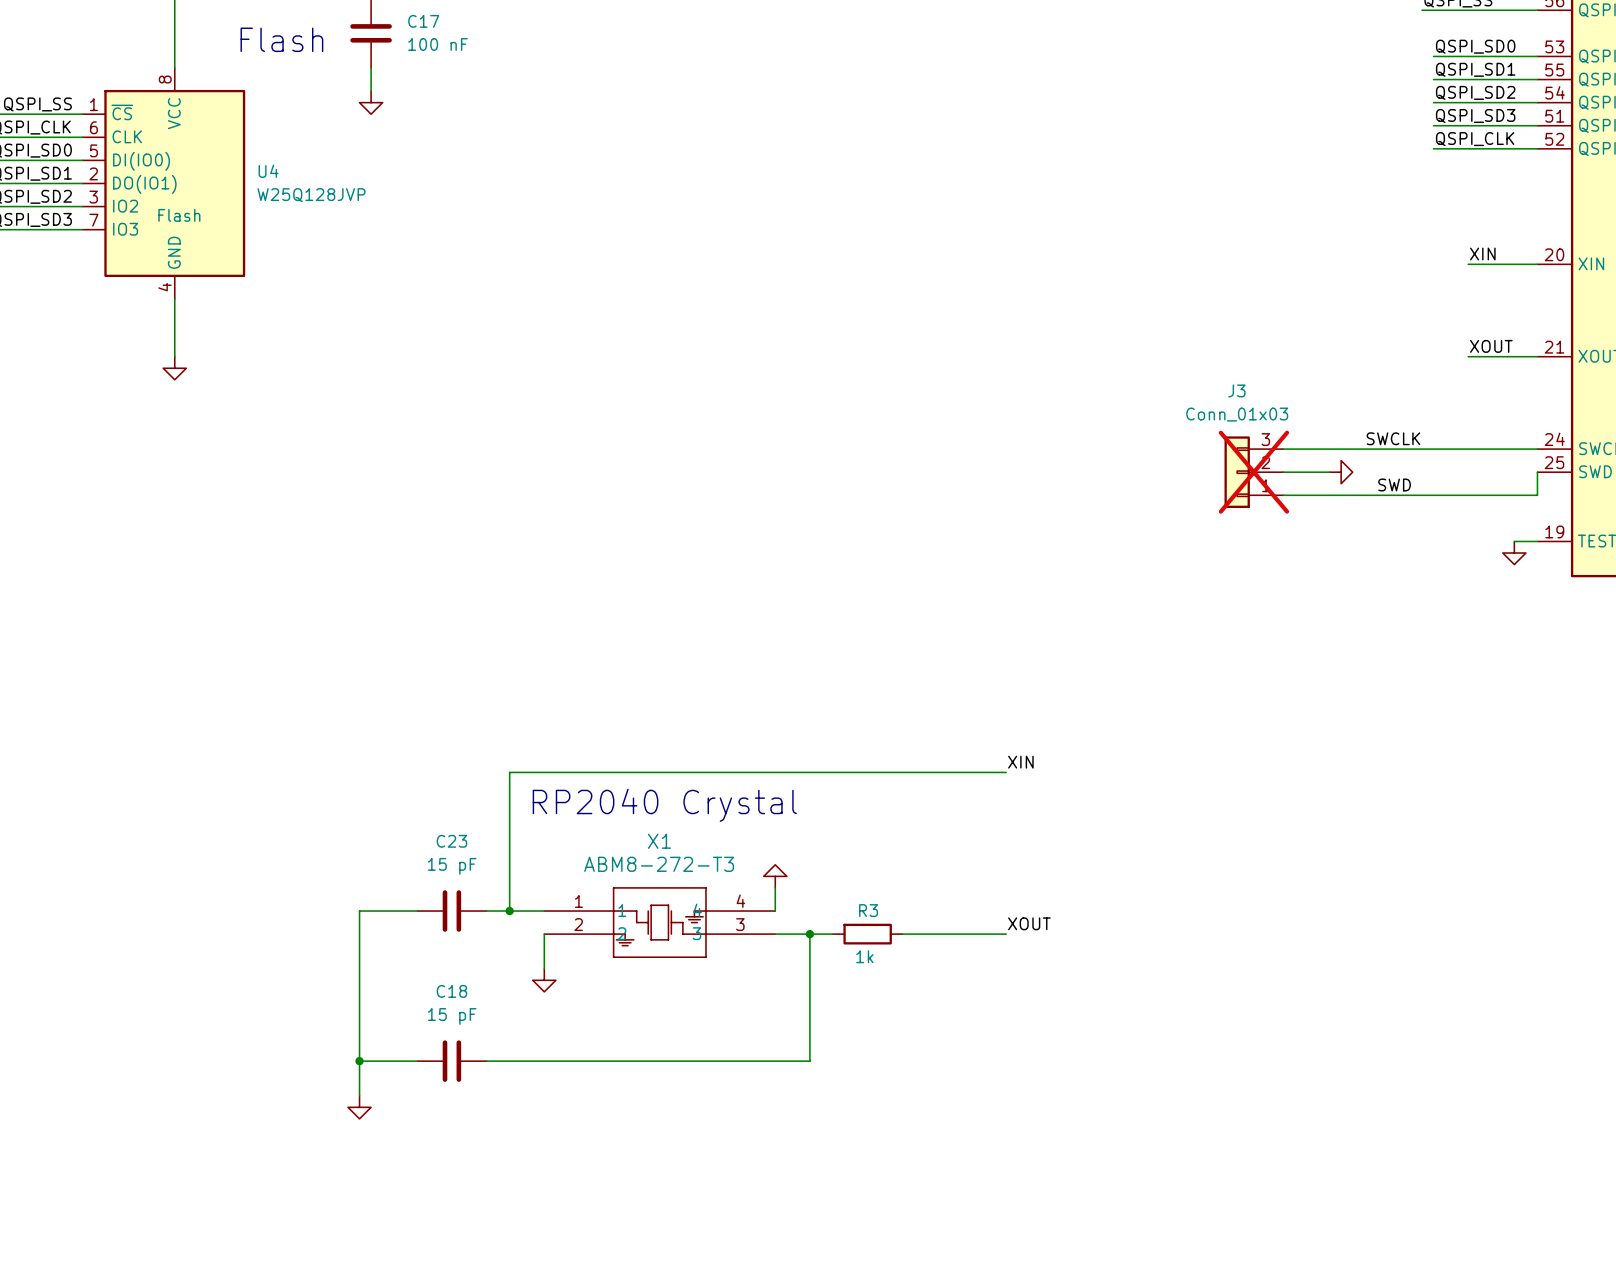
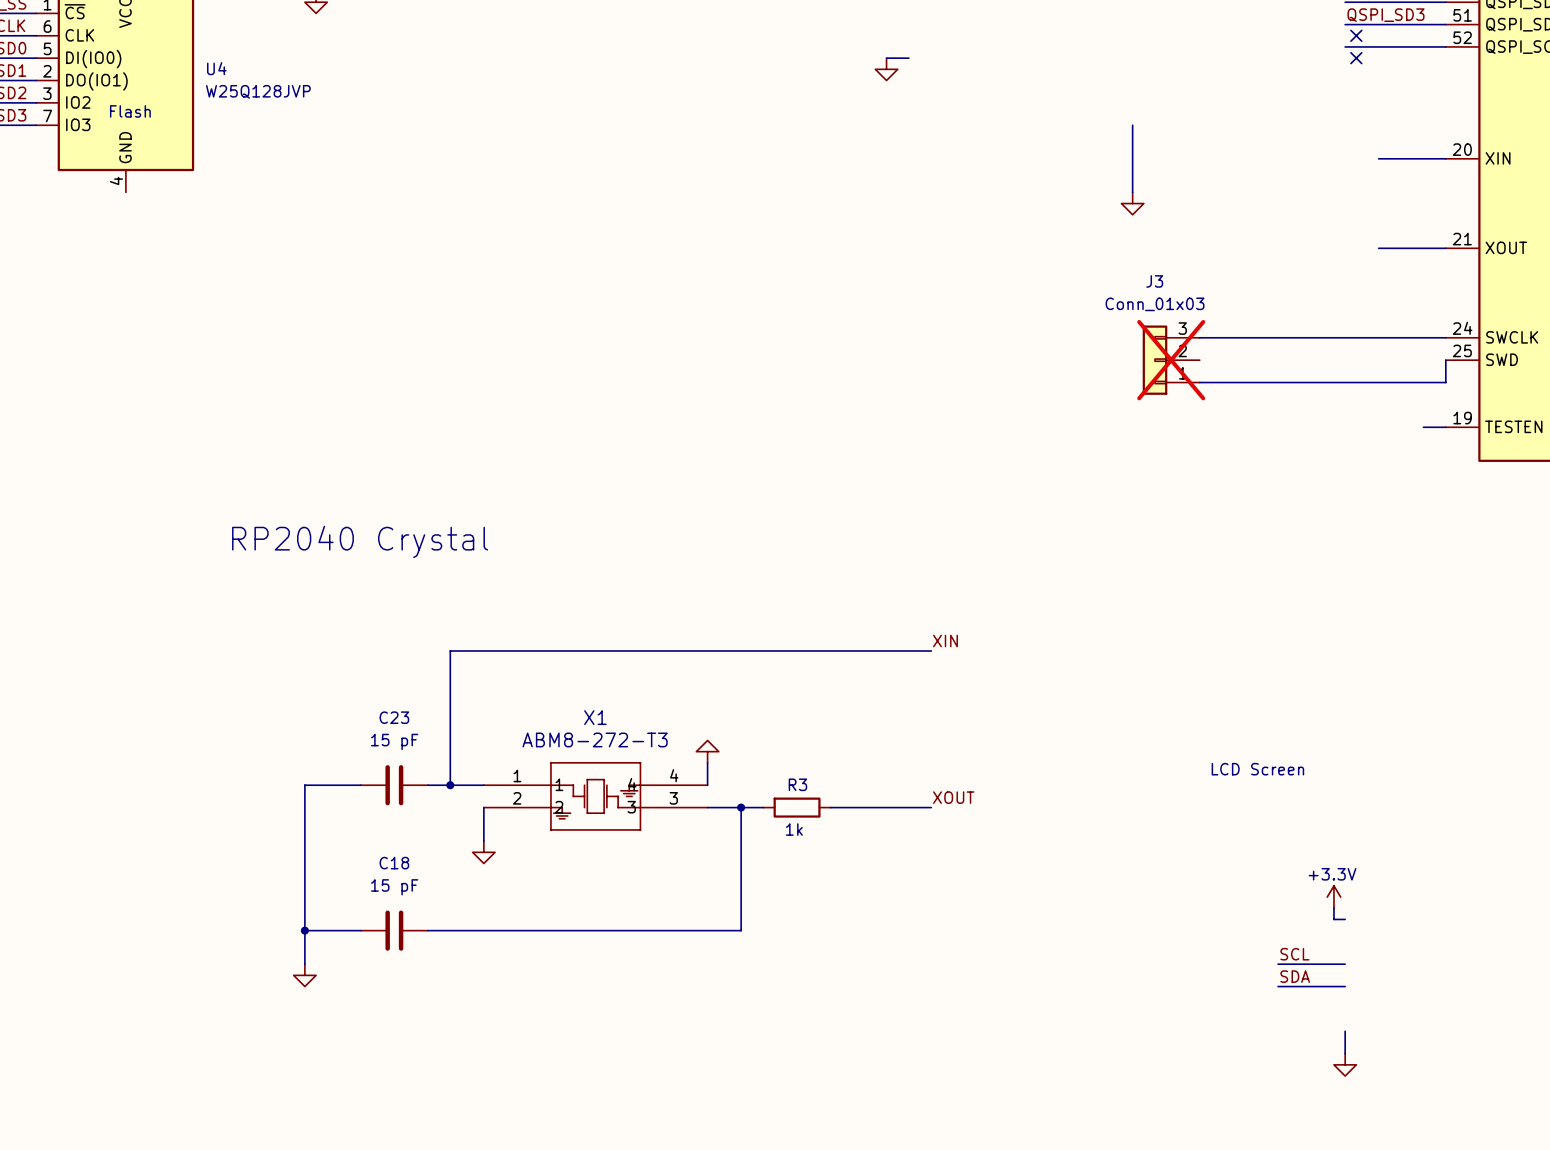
no-connect mark: none -> (1356, 35)
label: QSPI_CLK (1475, 139) -> none
wire: none -> (886, 58) (908, 58)
no-connect mark: none -> (1356, 58)
power symbol: none -> (886, 69)
wire: none -> (1132, 125) (1132, 192)
label: XIN (1482, 254) -> none
wire: (174, 298) (174, 356) -> none
power symbol: none -> (1132, 203)
label: XOUT (1491, 346) -> none
power symbol: (174, 368) -> none
label: SWCLK (1393, 438) -> none
wire: (1283, 472) (1329, 472) -> none
power symbol: (1341, 472) -> none
label: SWD (1394, 484) -> none
power symbol: (1514, 553) -> none
text: none -> RP2040 Crystal (360, 541)
text: RP2040 Crystal (664, 805) -> none
text: none -> LCD Screen (1257, 769)
power symbol: none -> +3.3V (1333, 897)
wire: none -> (1333, 908) (1333, 919) (1345, 919)
label: none -> SCL (1294, 954)
wire: none -> (1278, 964) (1345, 964)
label: none -> SDA (1295, 976)
wire: none -> (1278, 986) (1345, 986)
wire: none -> (1345, 1031) (1345, 1053)
power symbol: none -> (1345, 1064)

